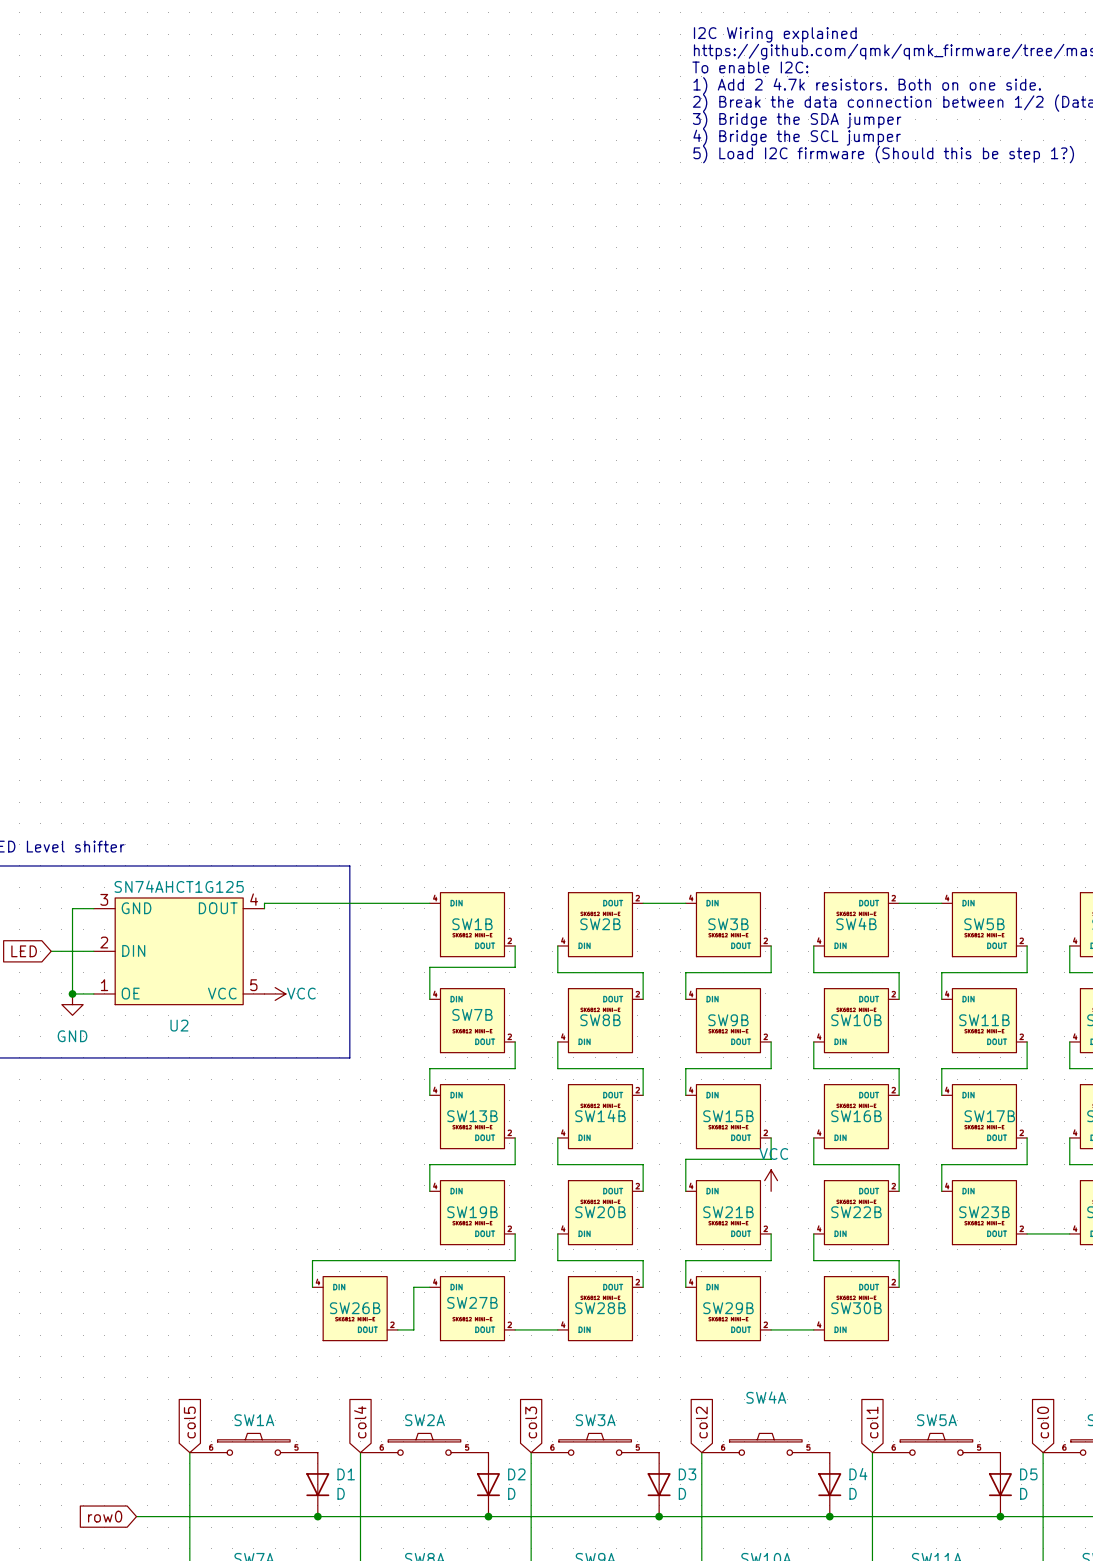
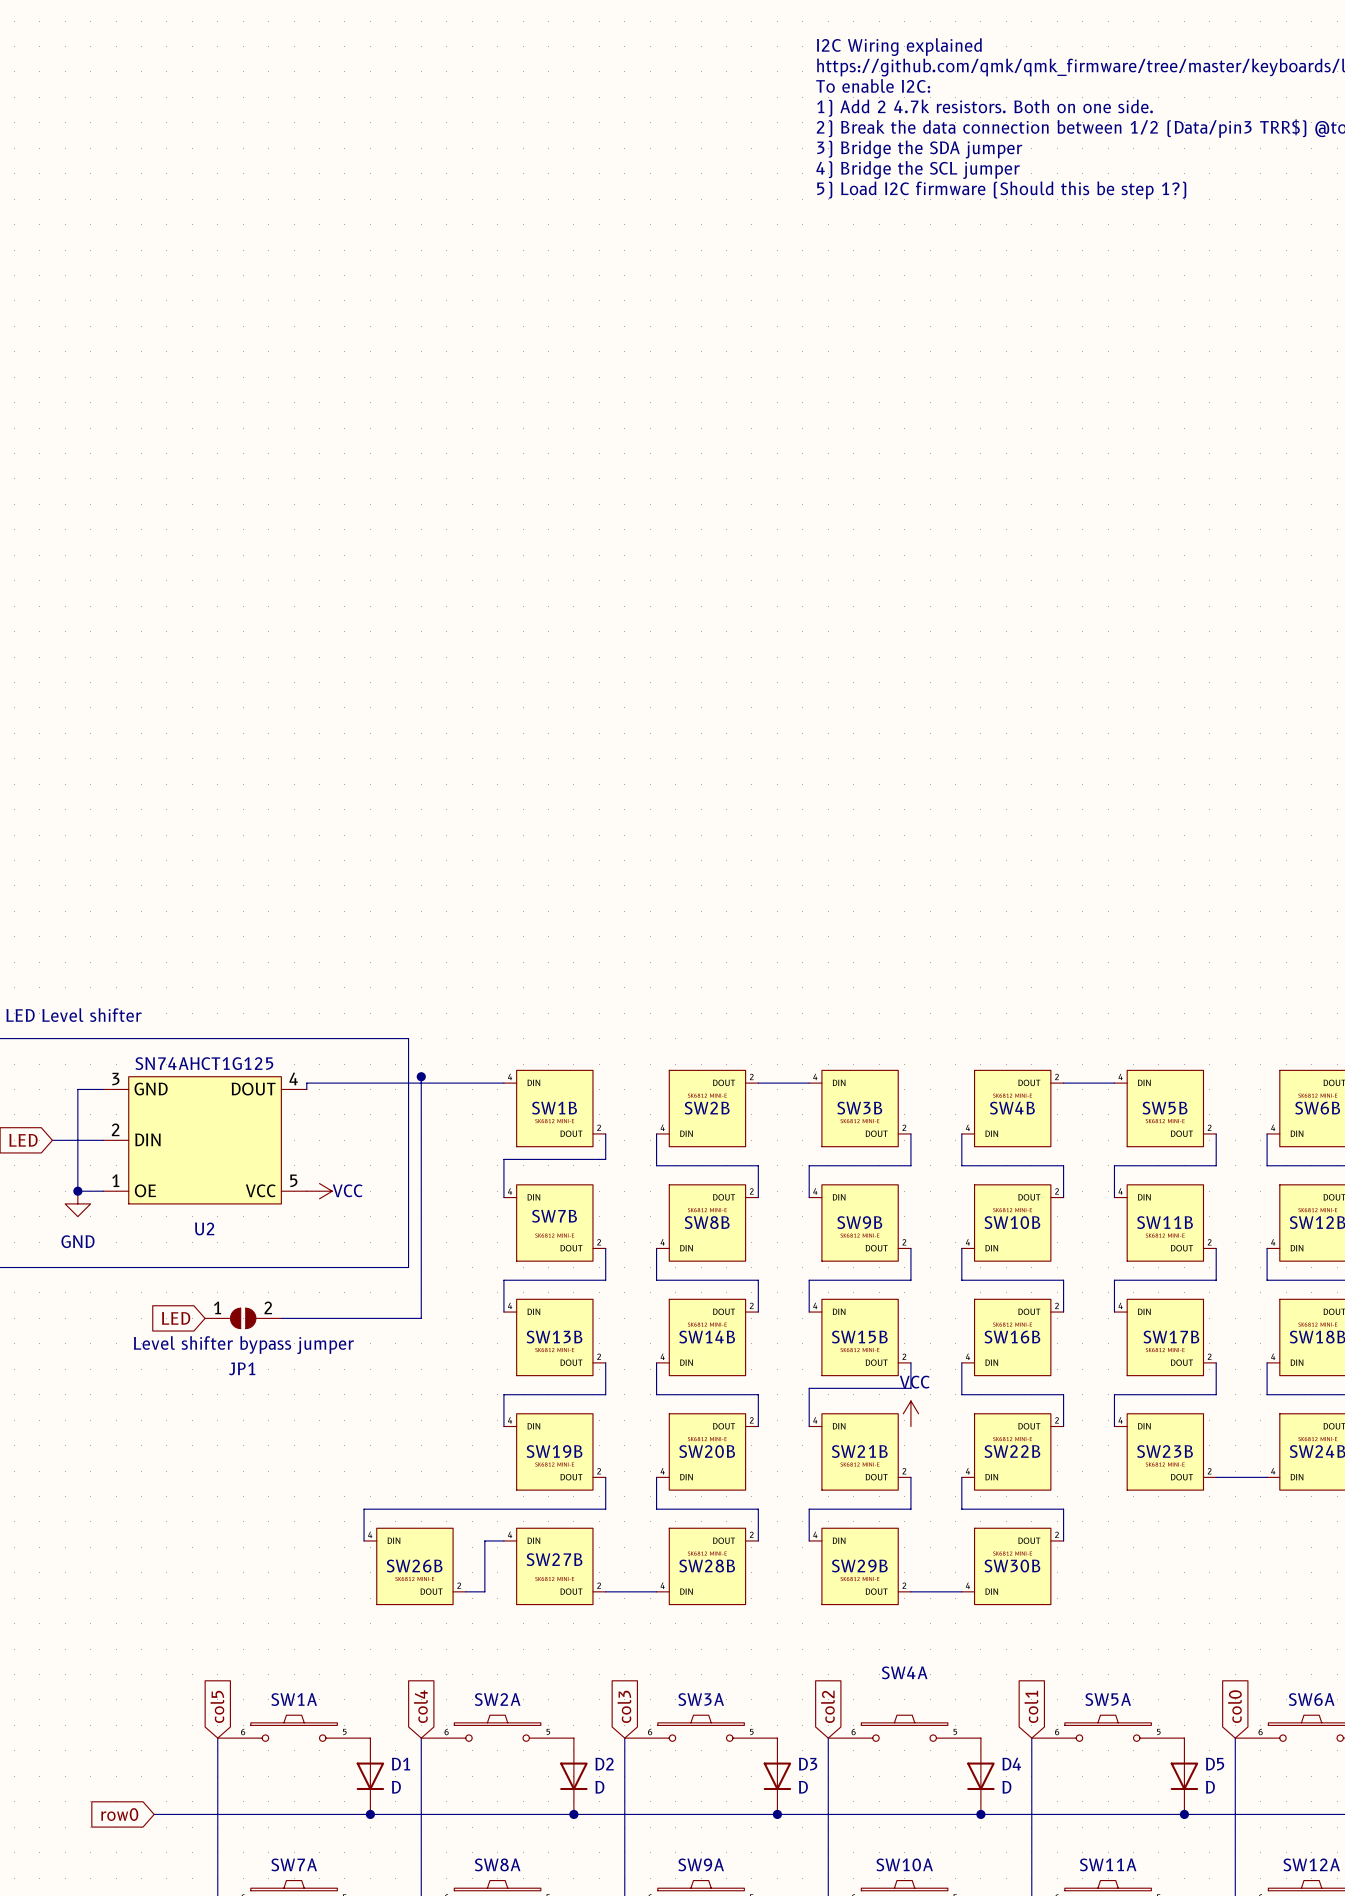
wire: none -> (421, 1076) (421, 1318) (281, 1318)
junction: none -> (421, 1076)
global label: none -> LED (176, 1318)
JP1: none -> Level shifter bypass jumper (243, 1318)

